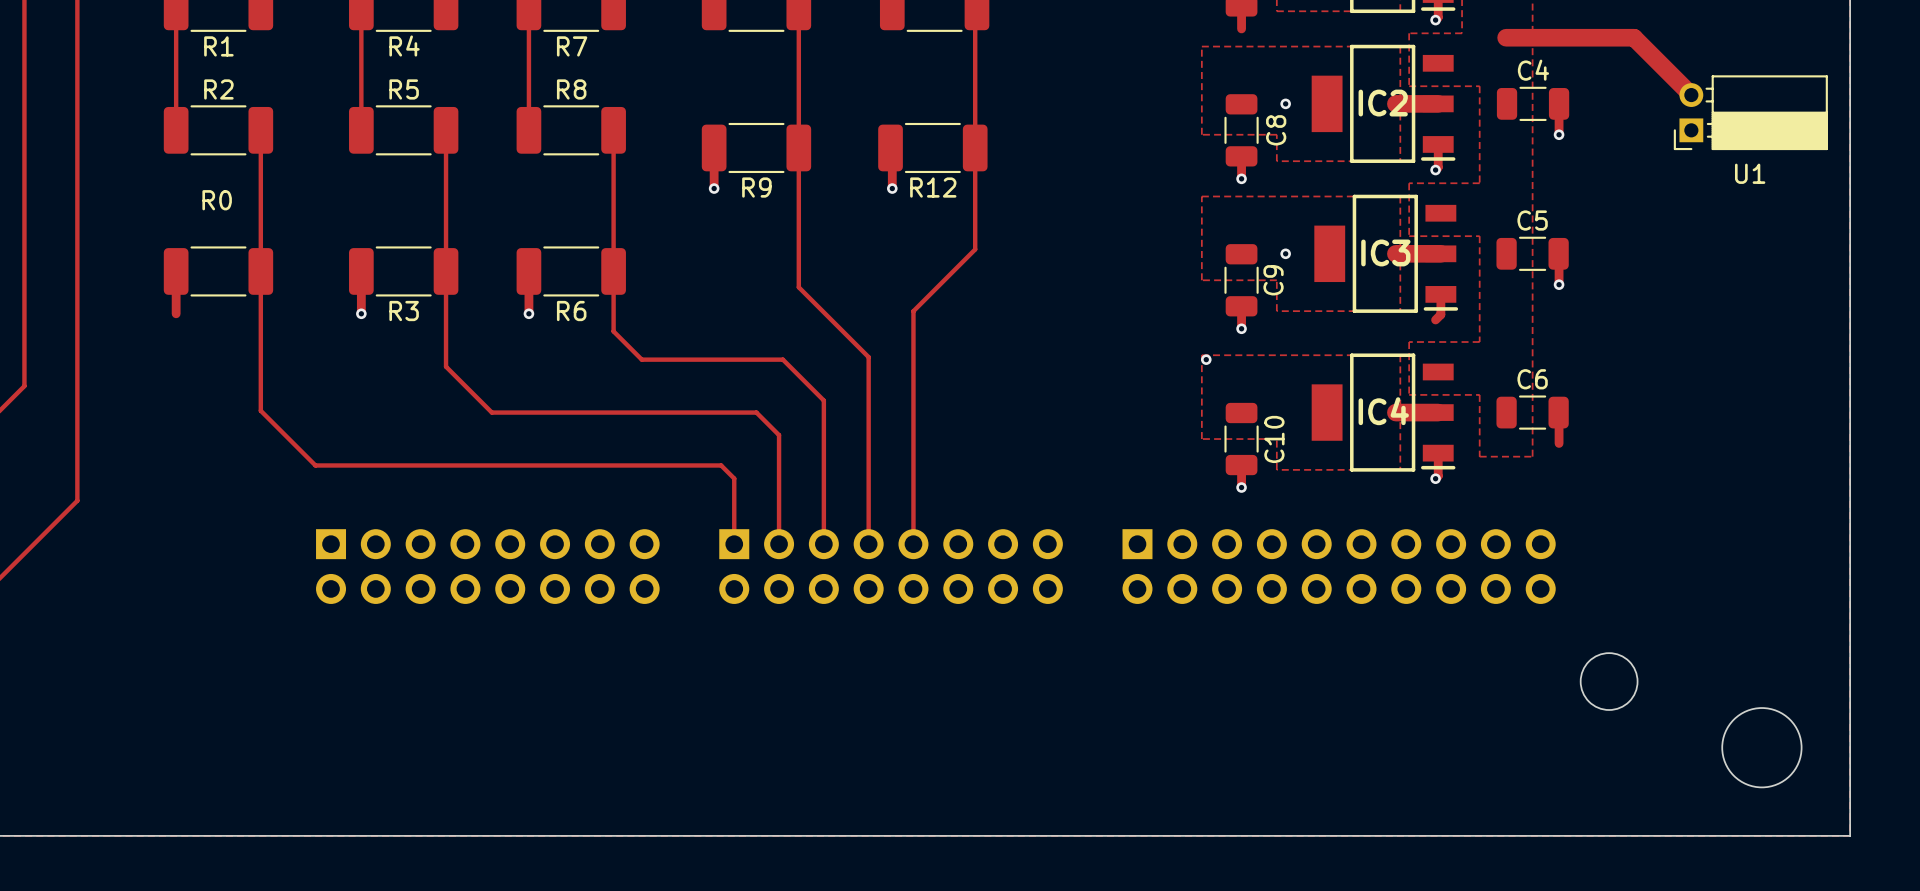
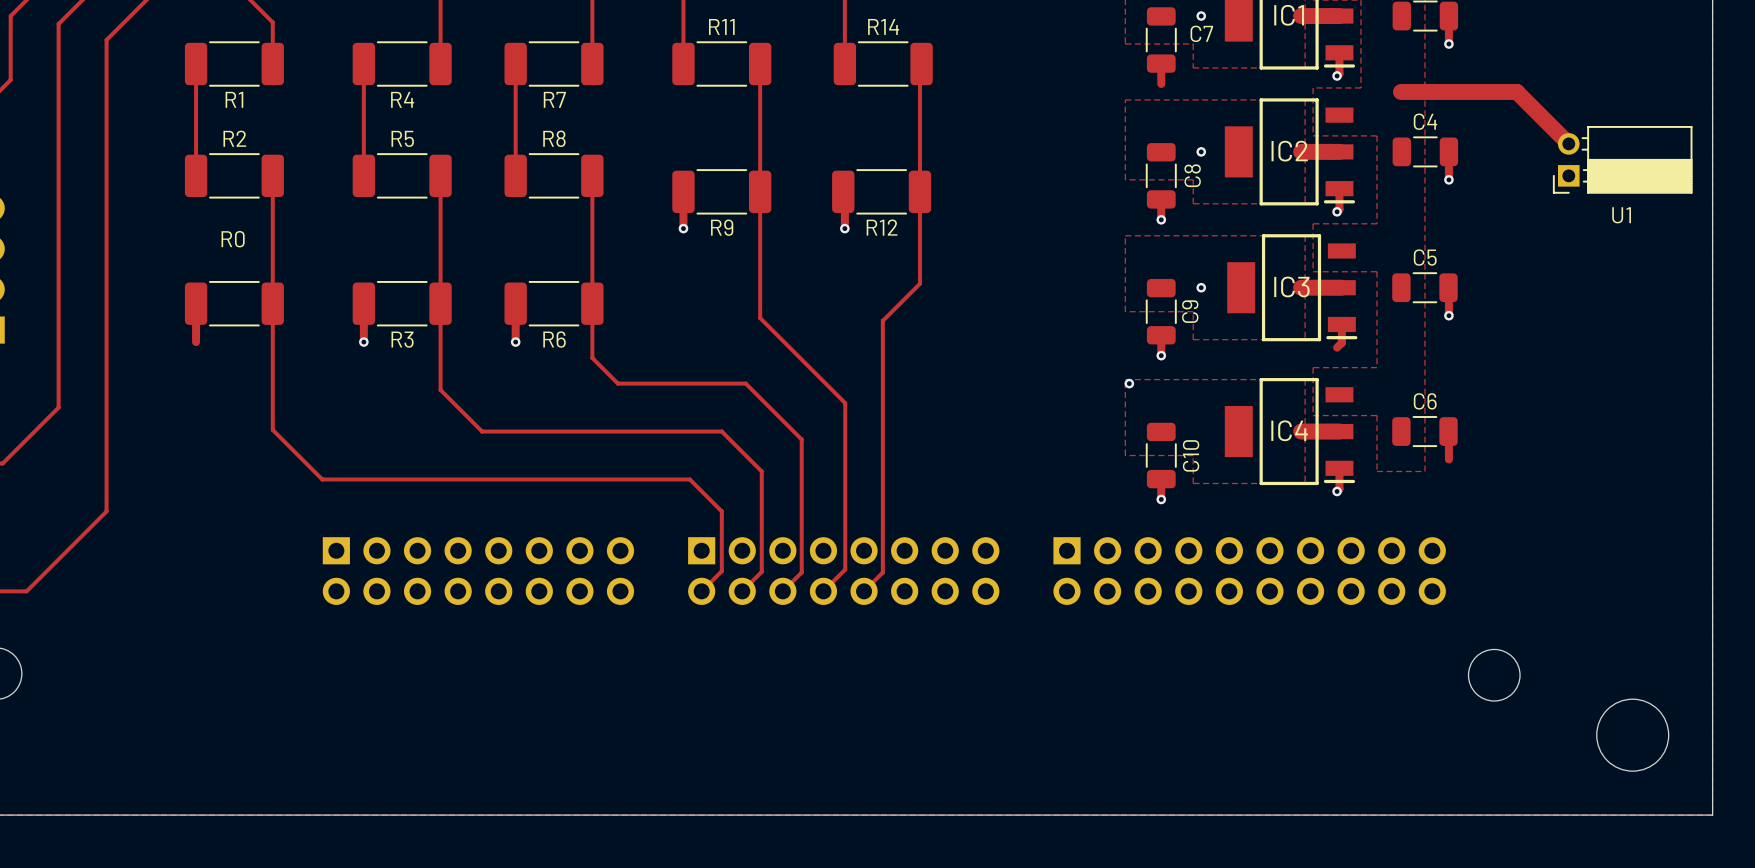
track: (934, 290) (913, 311) (913, 544) -> (882, 320) (882, 572) (864, 591)
track: (868, 357) (868, 544) -> (823, 381) (845, 403) (845, 569) (823, 591)
track: (823, 400) (823, 544) -> (782, 420) (801, 439) (801, 572) (782, 591)
track: (779, 435) (779, 544) -> (742, 452) (761, 471) (761, 571) (742, 591)
track: (734, 478) (734, 544) -> (701, 491) (721, 511) (721, 571) (701, 591)

